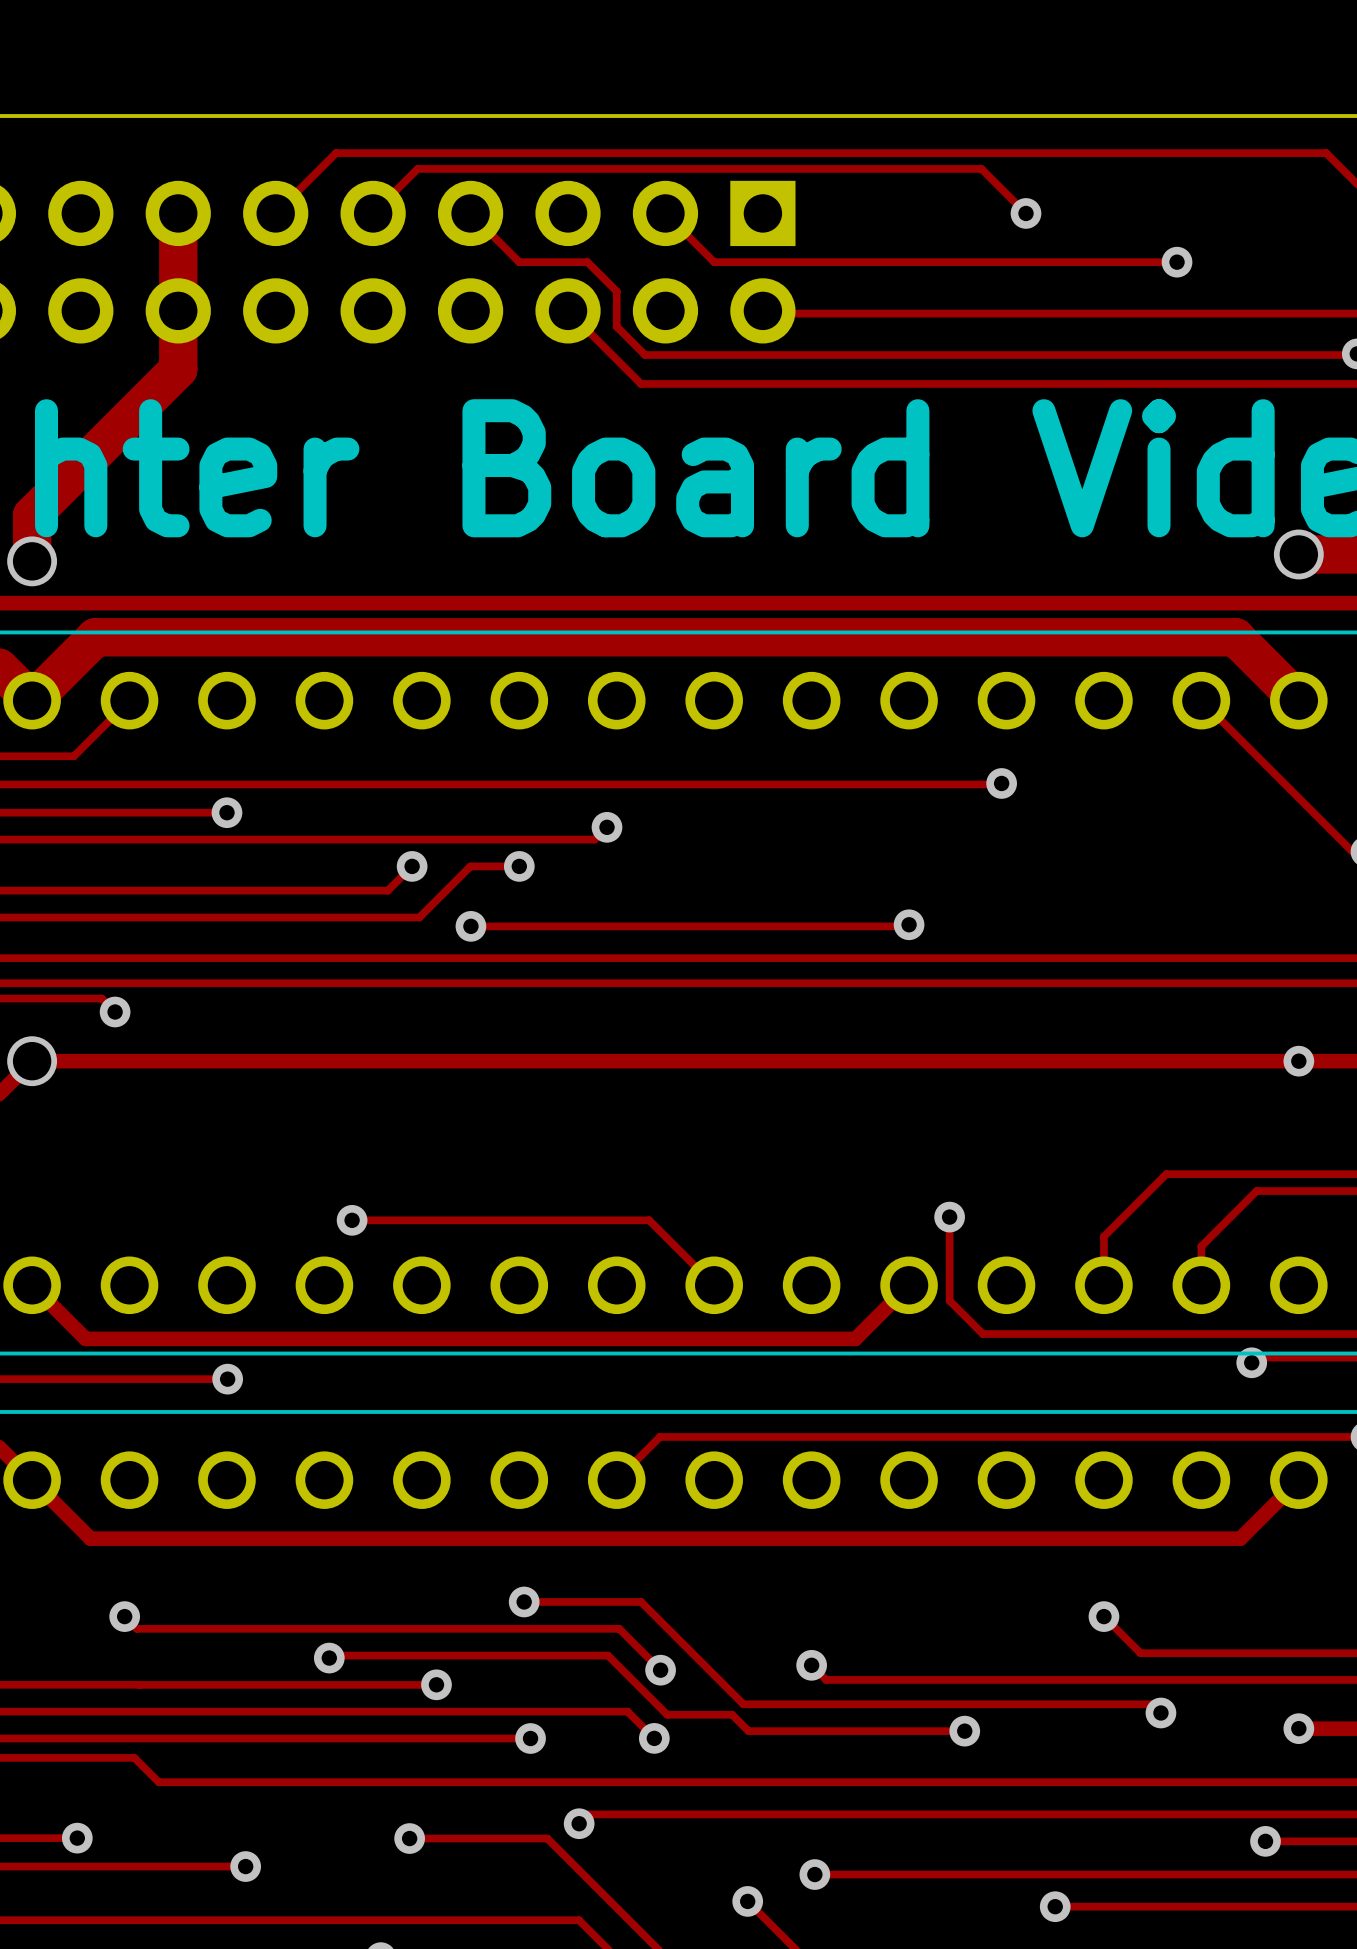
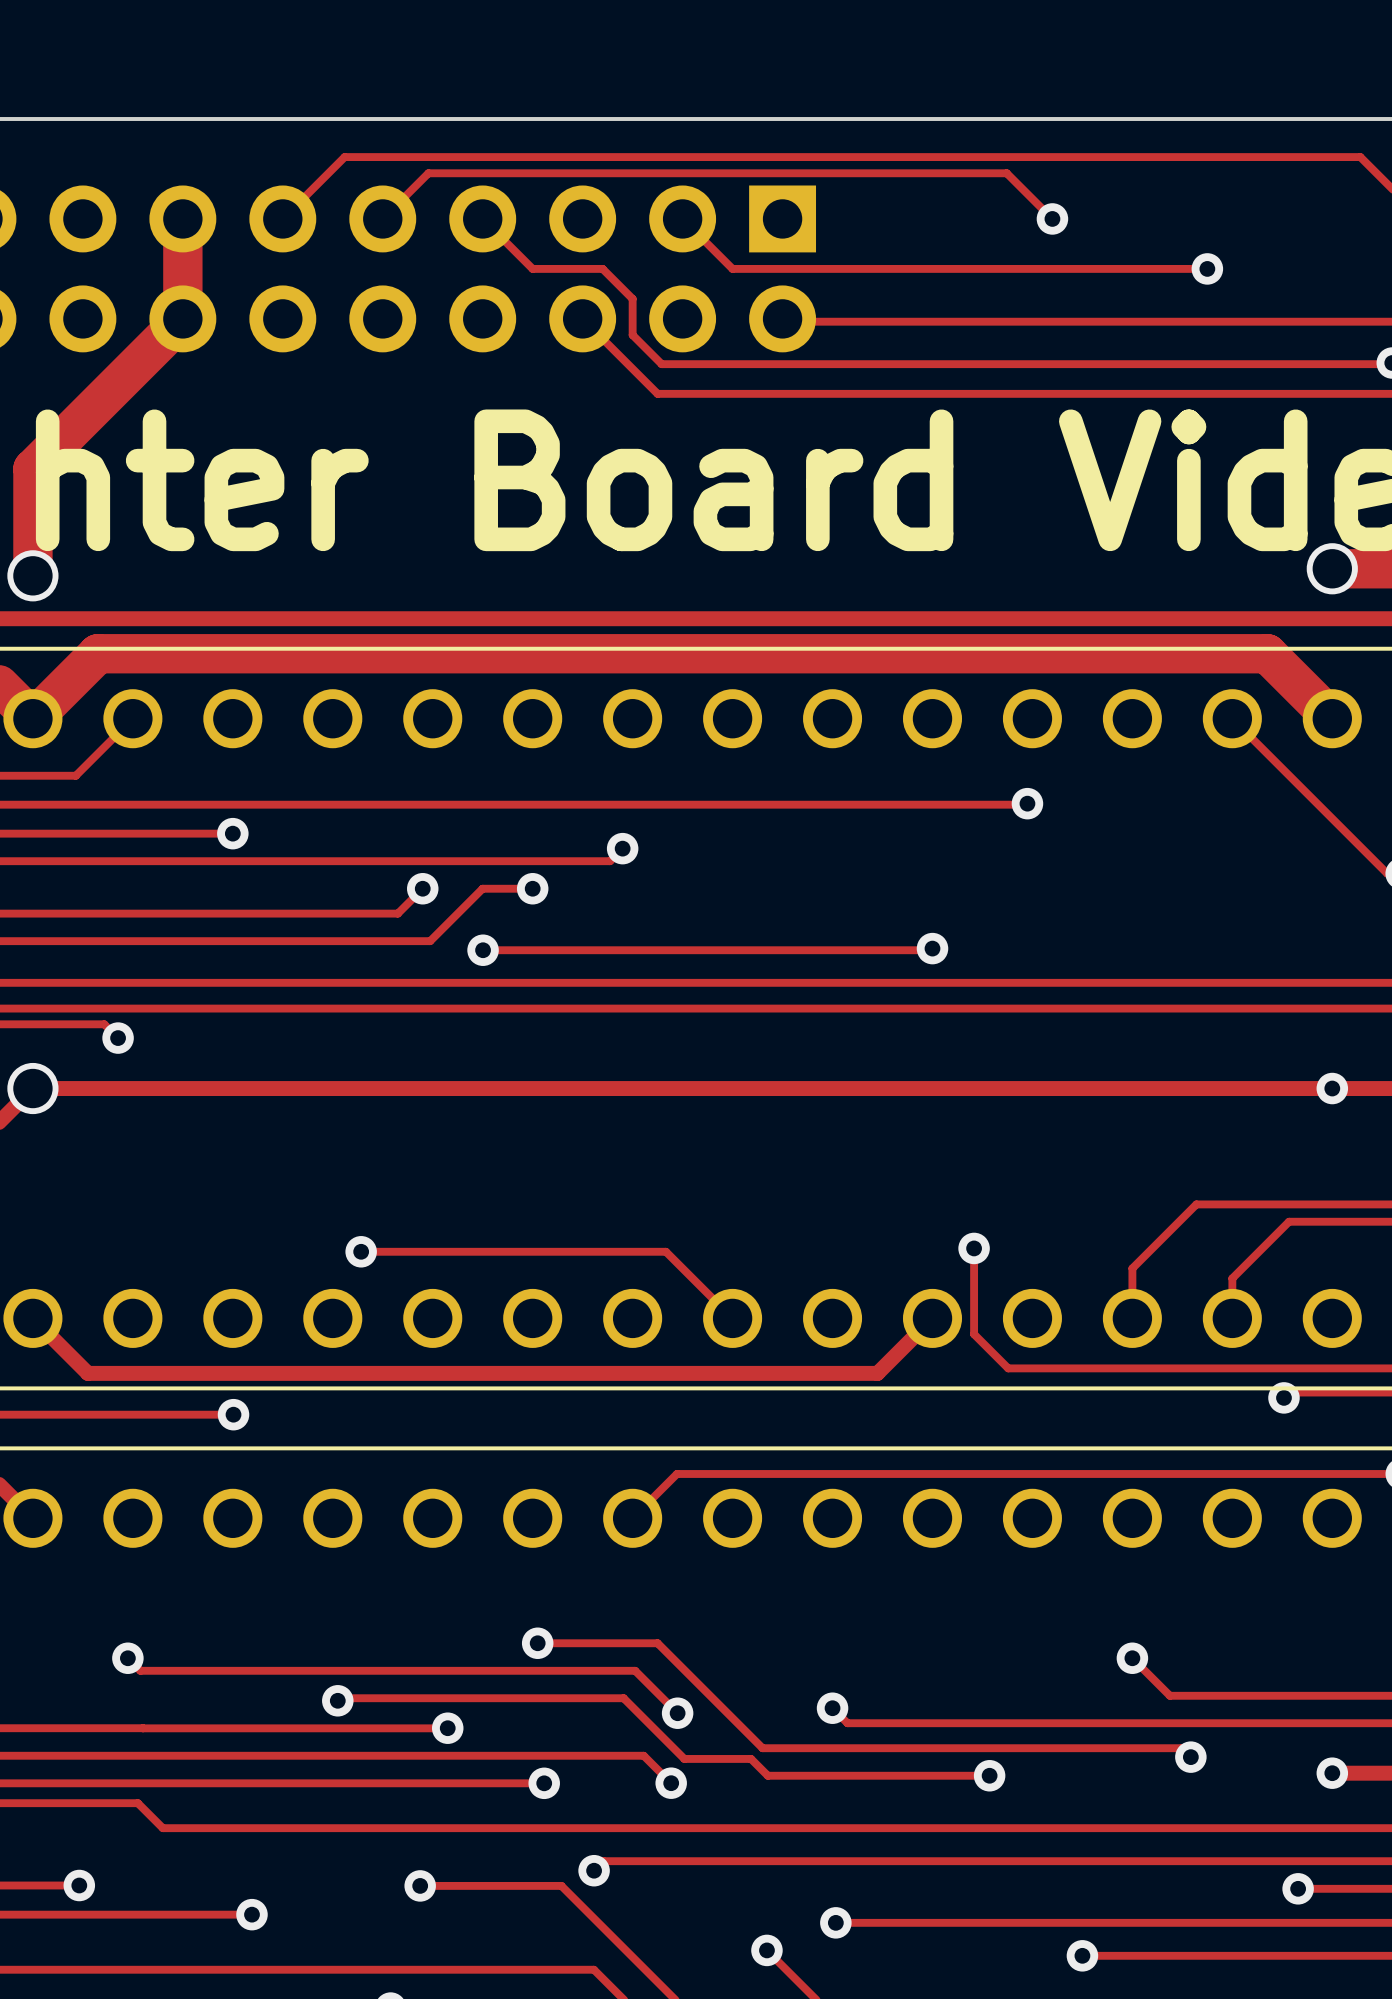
track: (178, 310) (178, 369) (32, 515) -> (182, 318) (32, 468) (32, 528)
track: (32, 1480) (90, 1538) (1240, 1538) (1298, 1480) -> none

